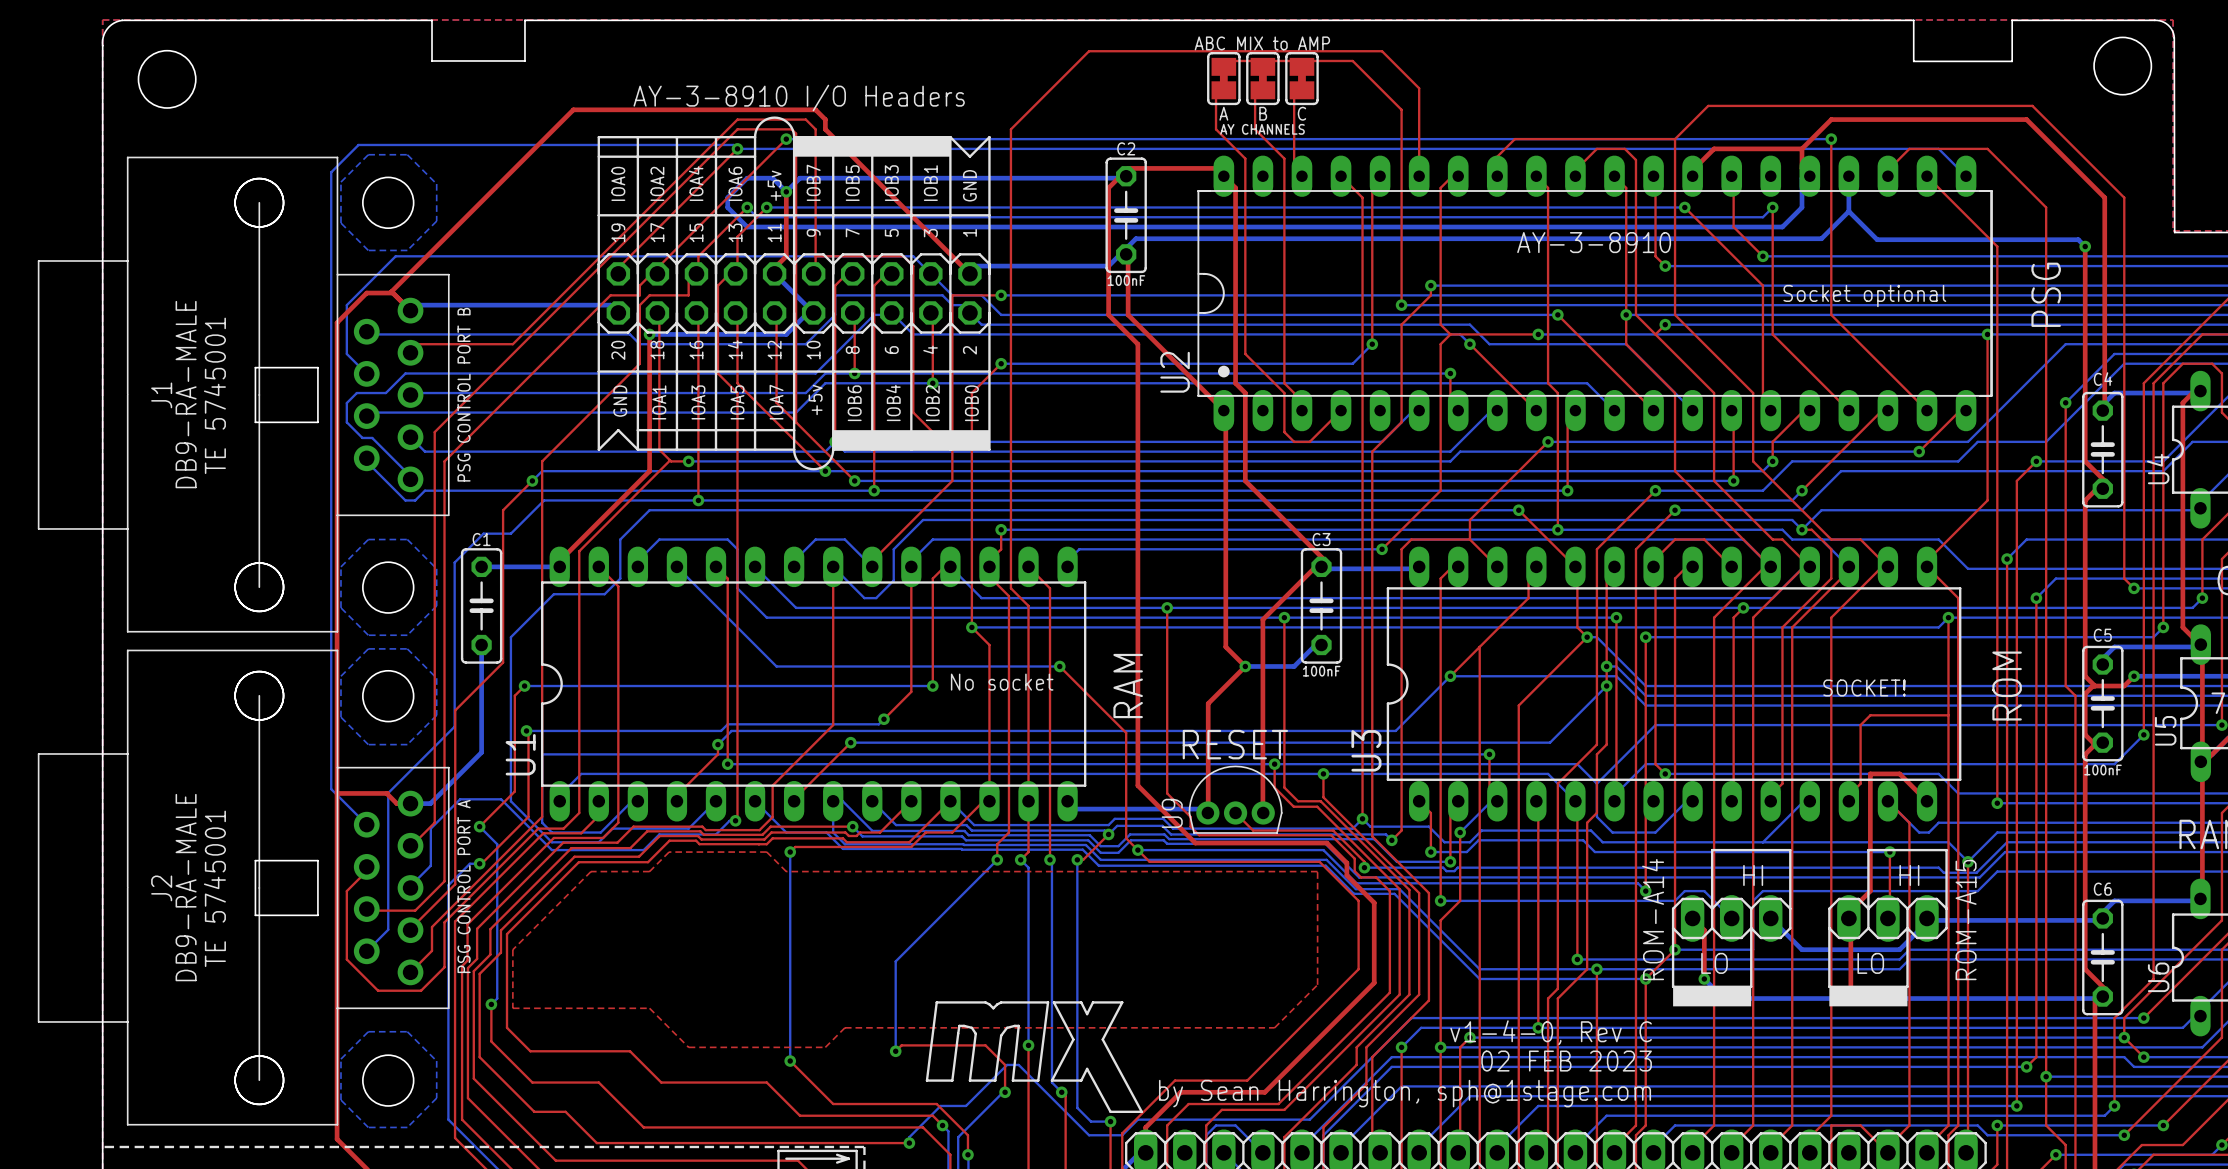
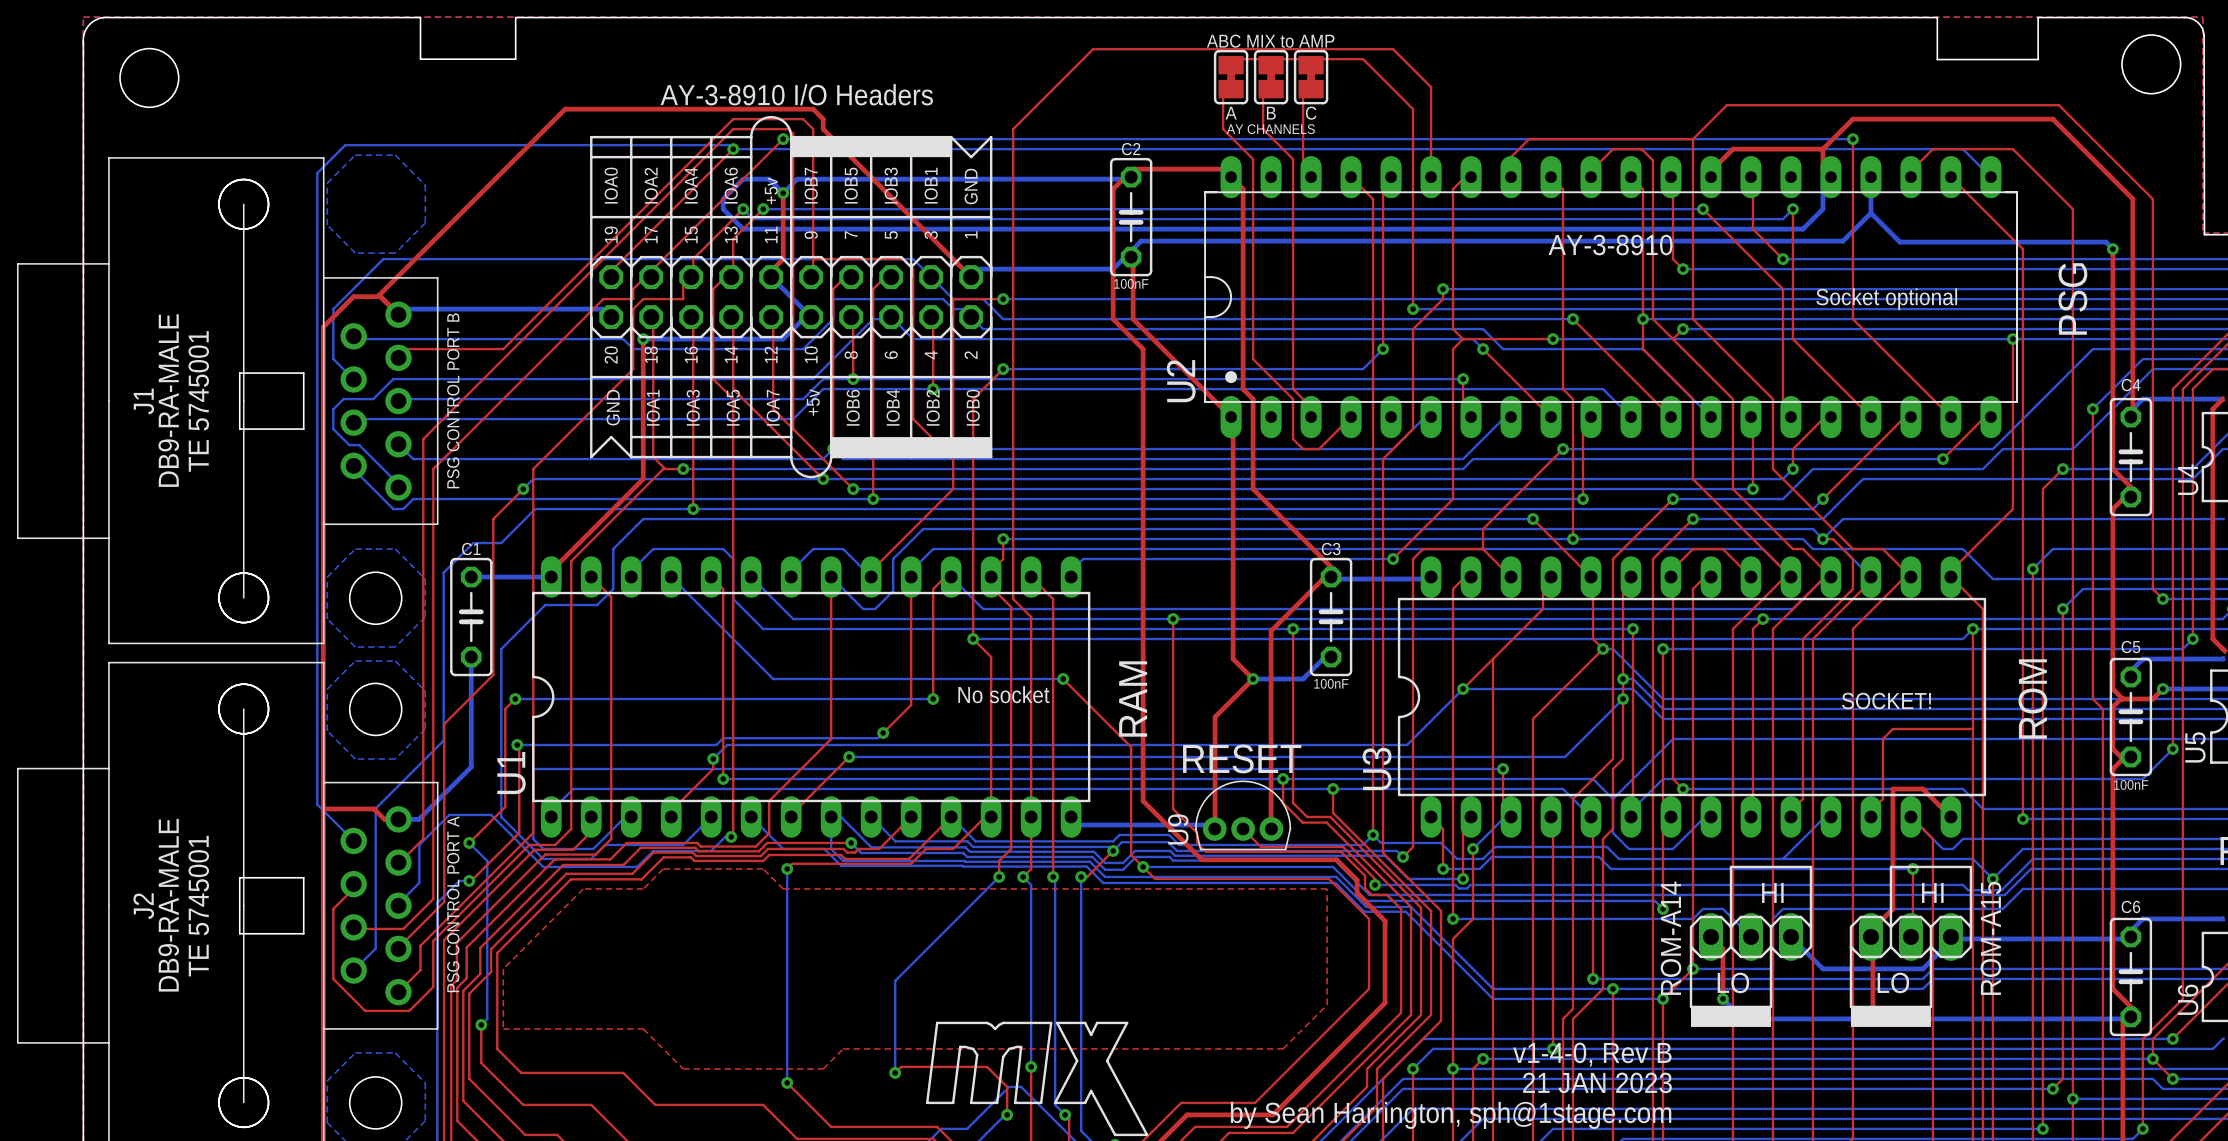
round board edge: [362, 177, 414, 229] -> none
text: v1-4-0, Rev C (1551, 1032) -> v1-4-0, Rev B (1592, 1054)
text: 02 FEB 2023 (1566, 1061) -> 21 JAN 2023 (1597, 1082)

